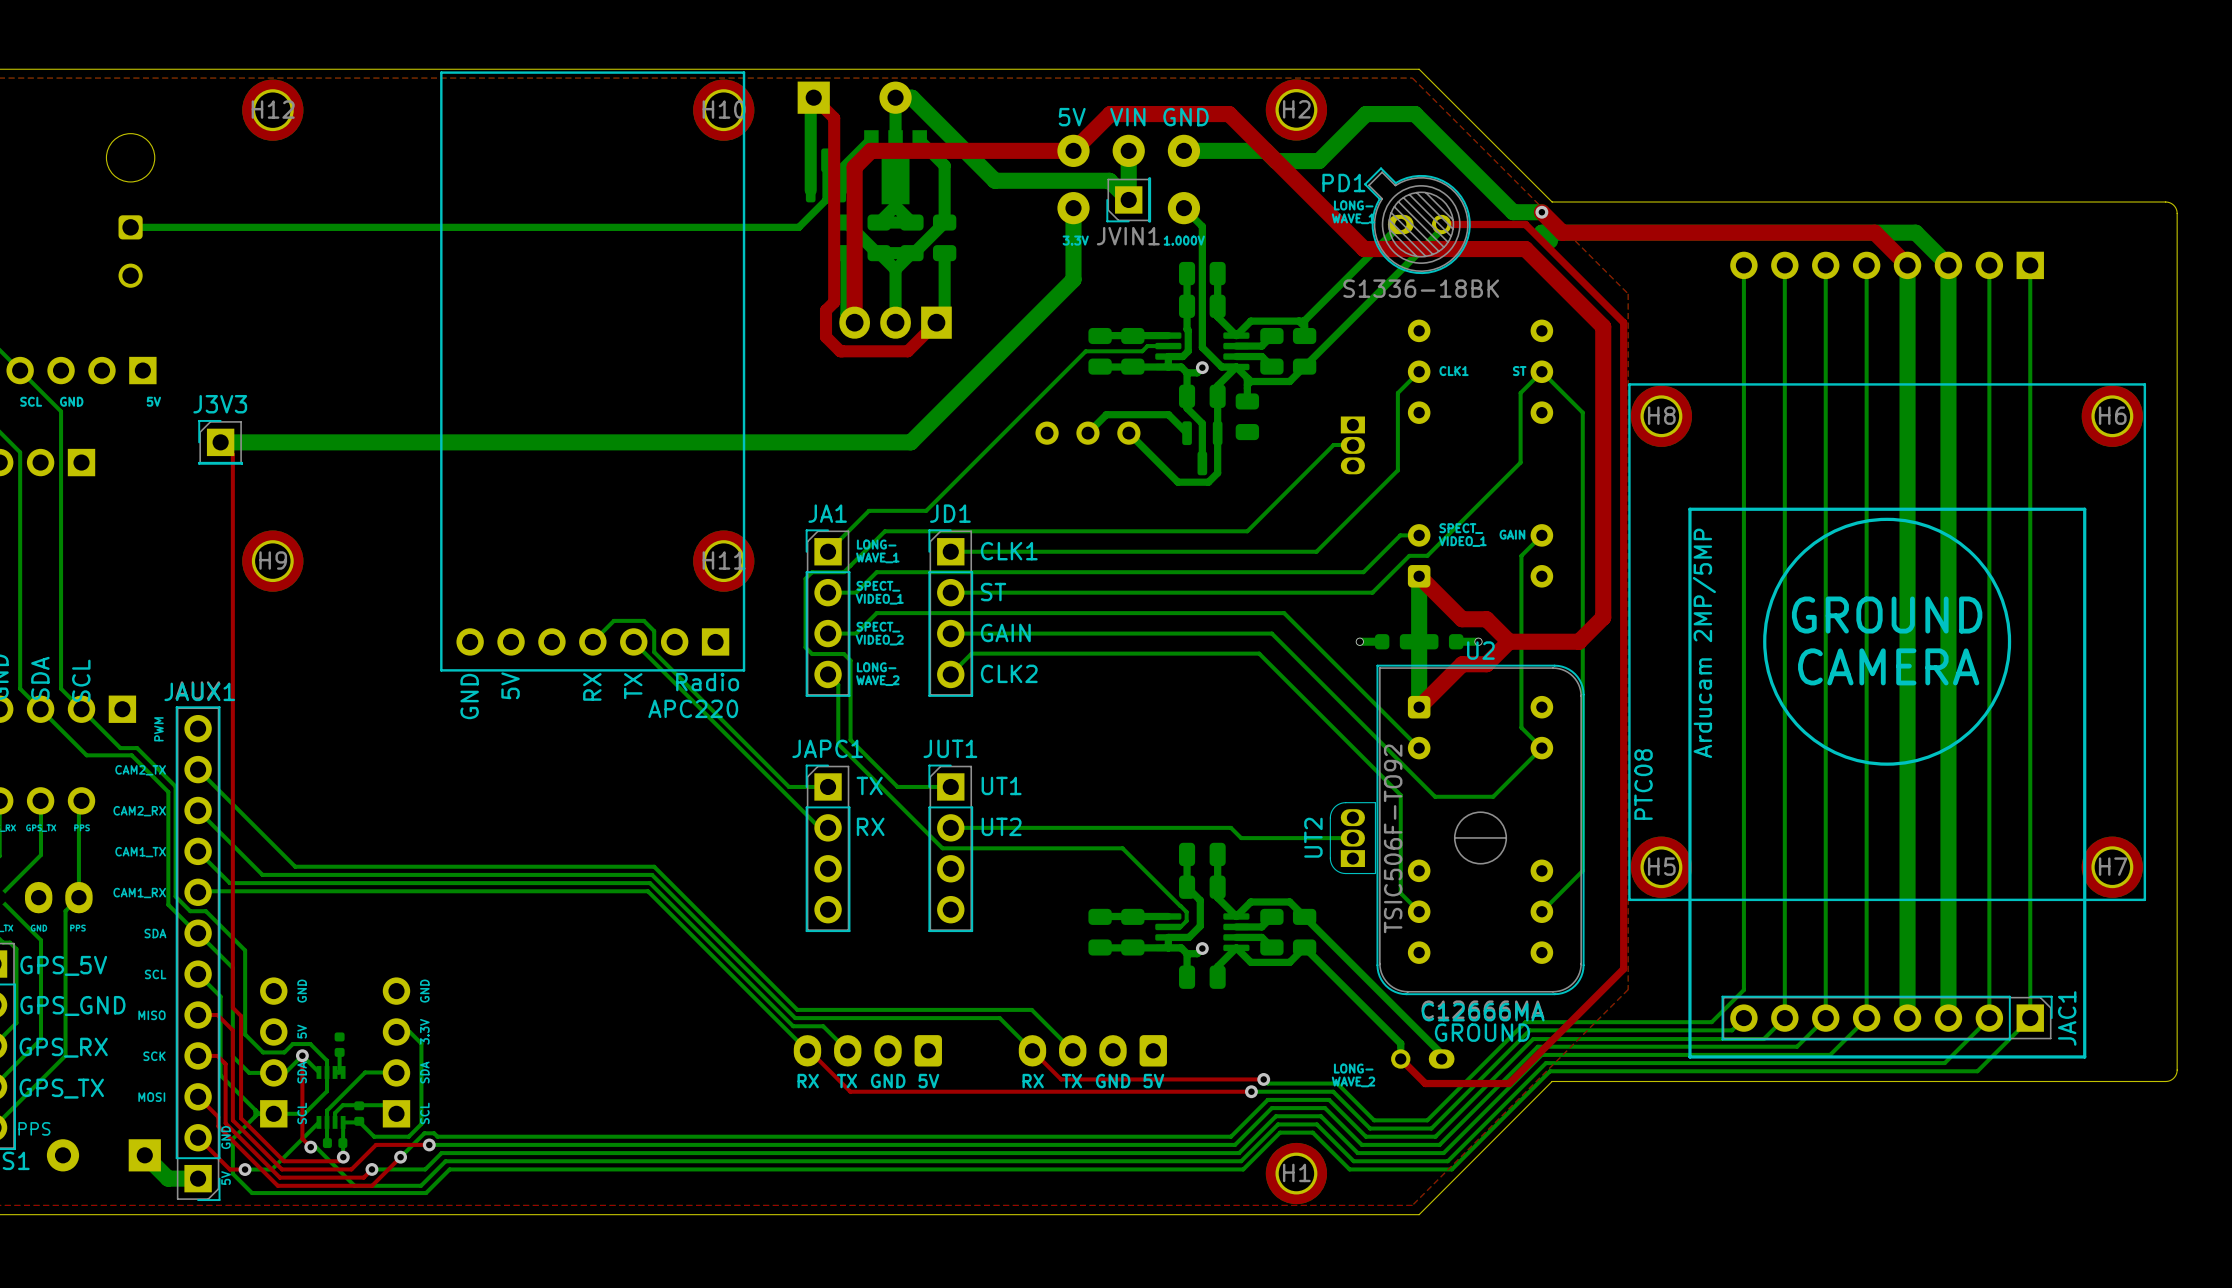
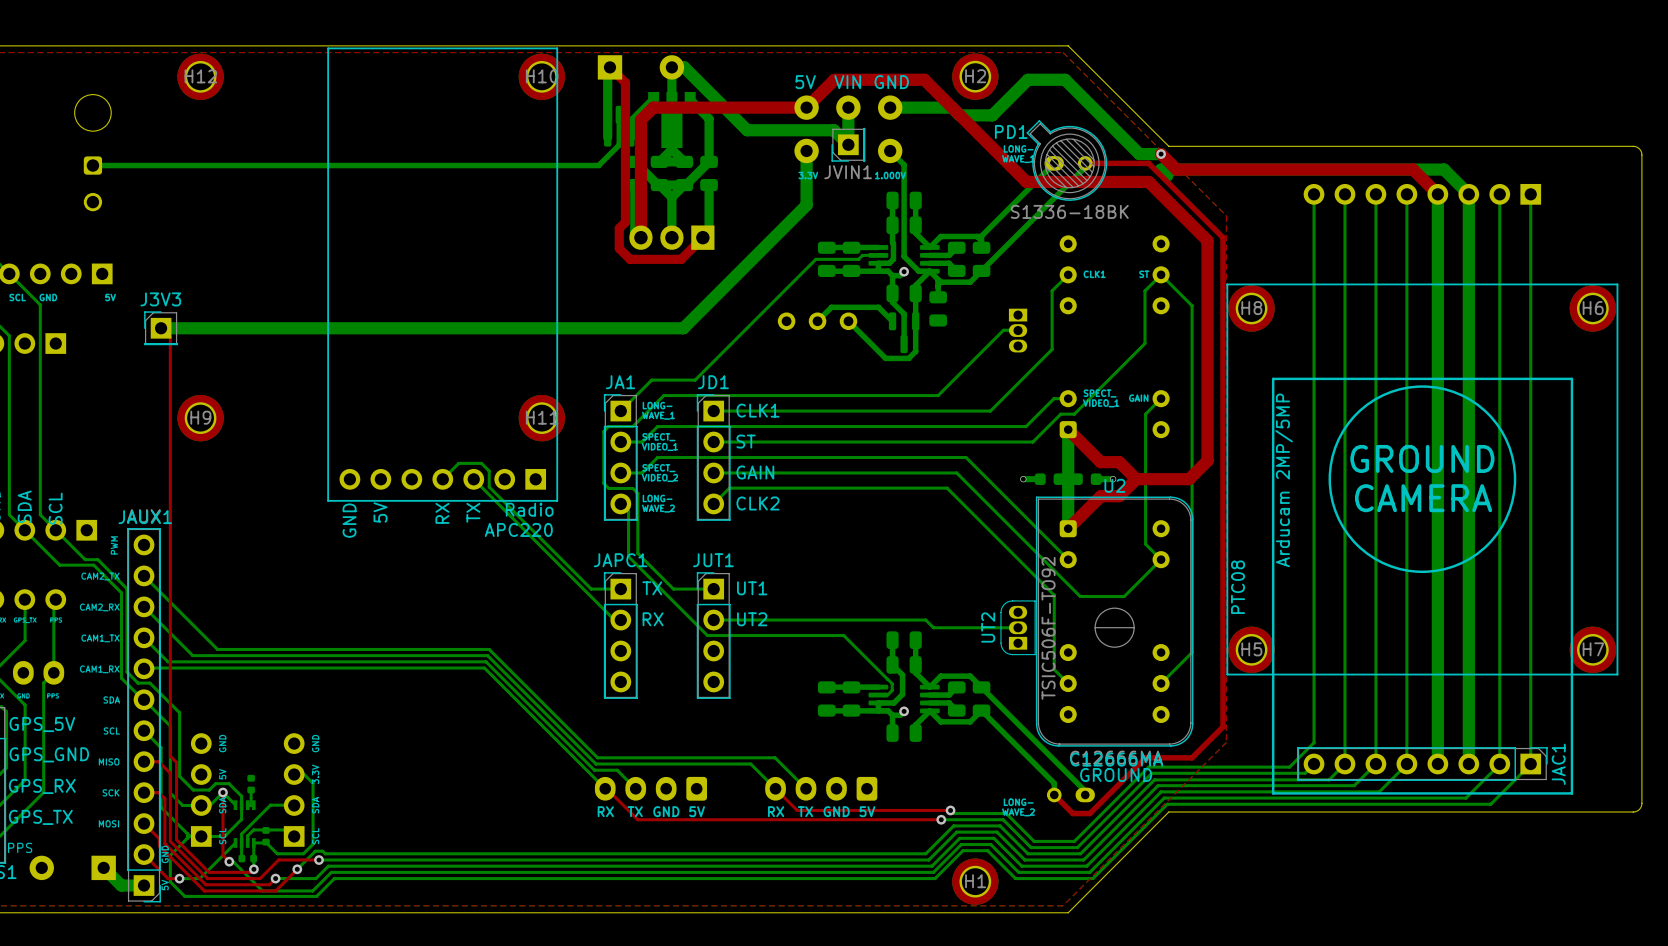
top track: (1582, 1009) (1509, 1083) (1447, 1083) -> (1192, 757) (1145, 757) (1089, 813)

